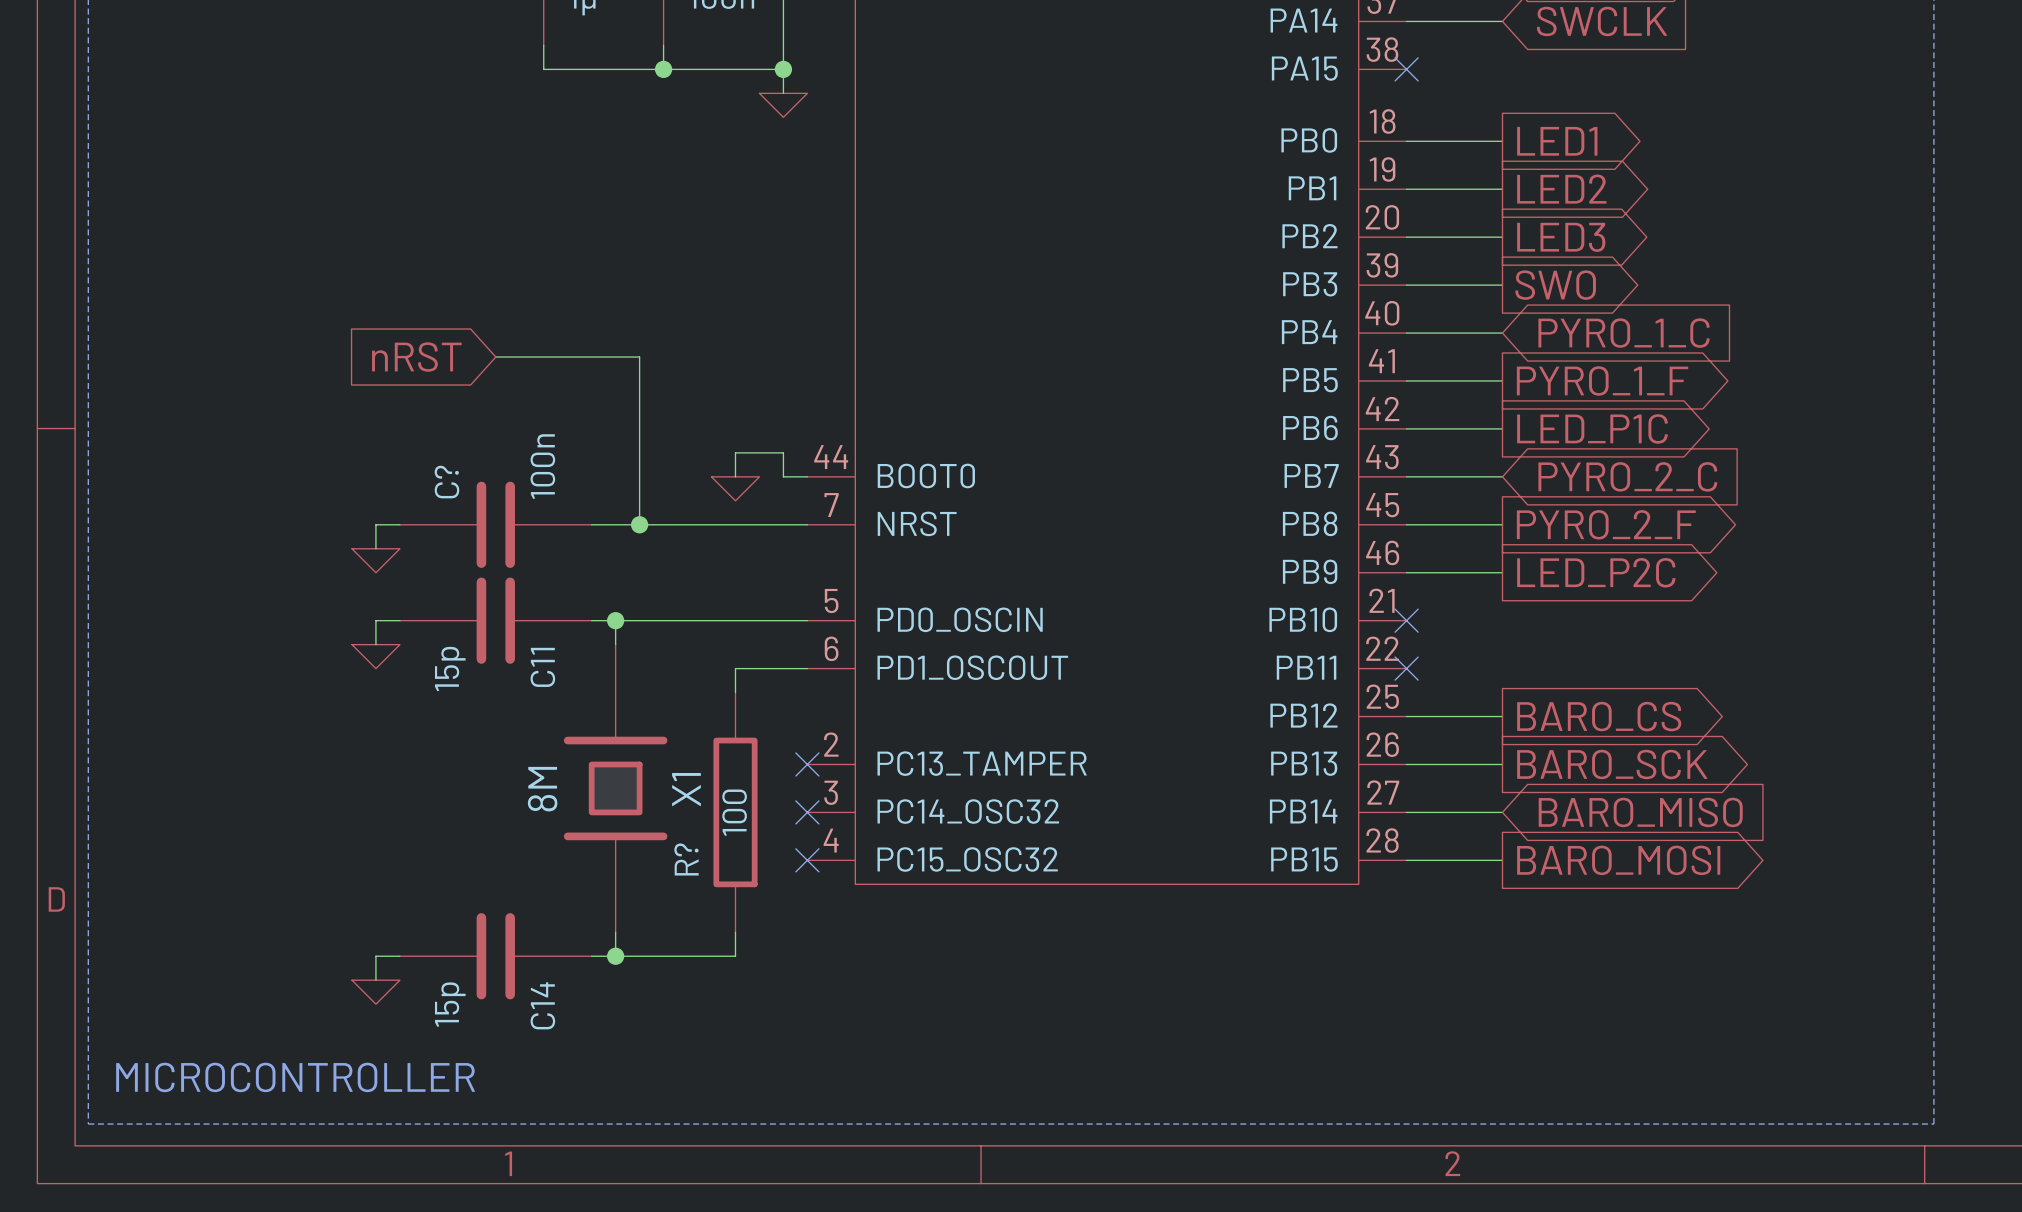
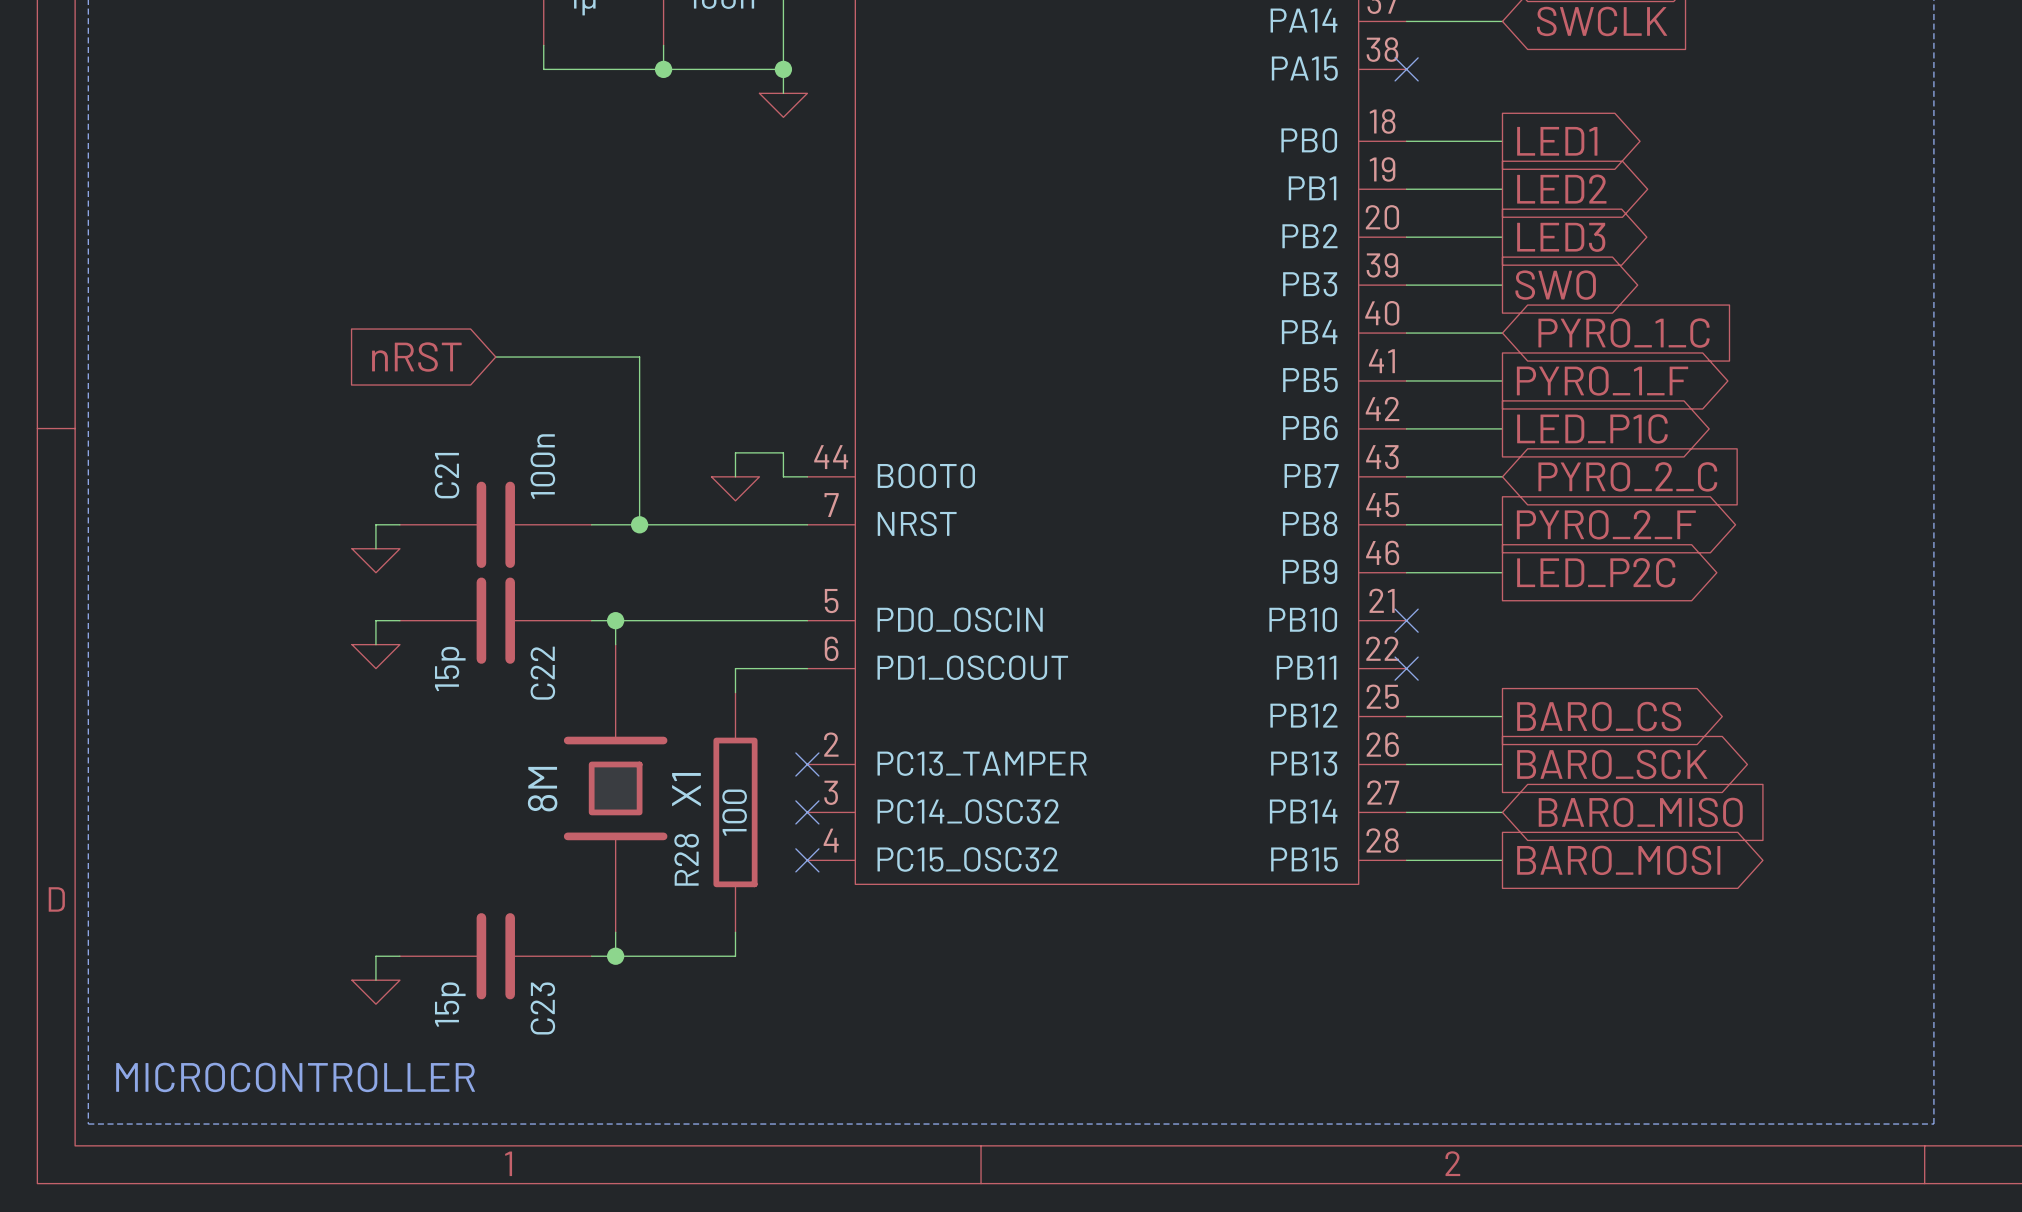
C? name: C? (446, 482) -> C21 (446, 475)
C11 name: C11 (542, 667) -> C22 (542, 673)
R? name: R? (686, 859) -> R28 (686, 859)
C14 name: C14 (542, 1005) -> C23 (542, 1008)

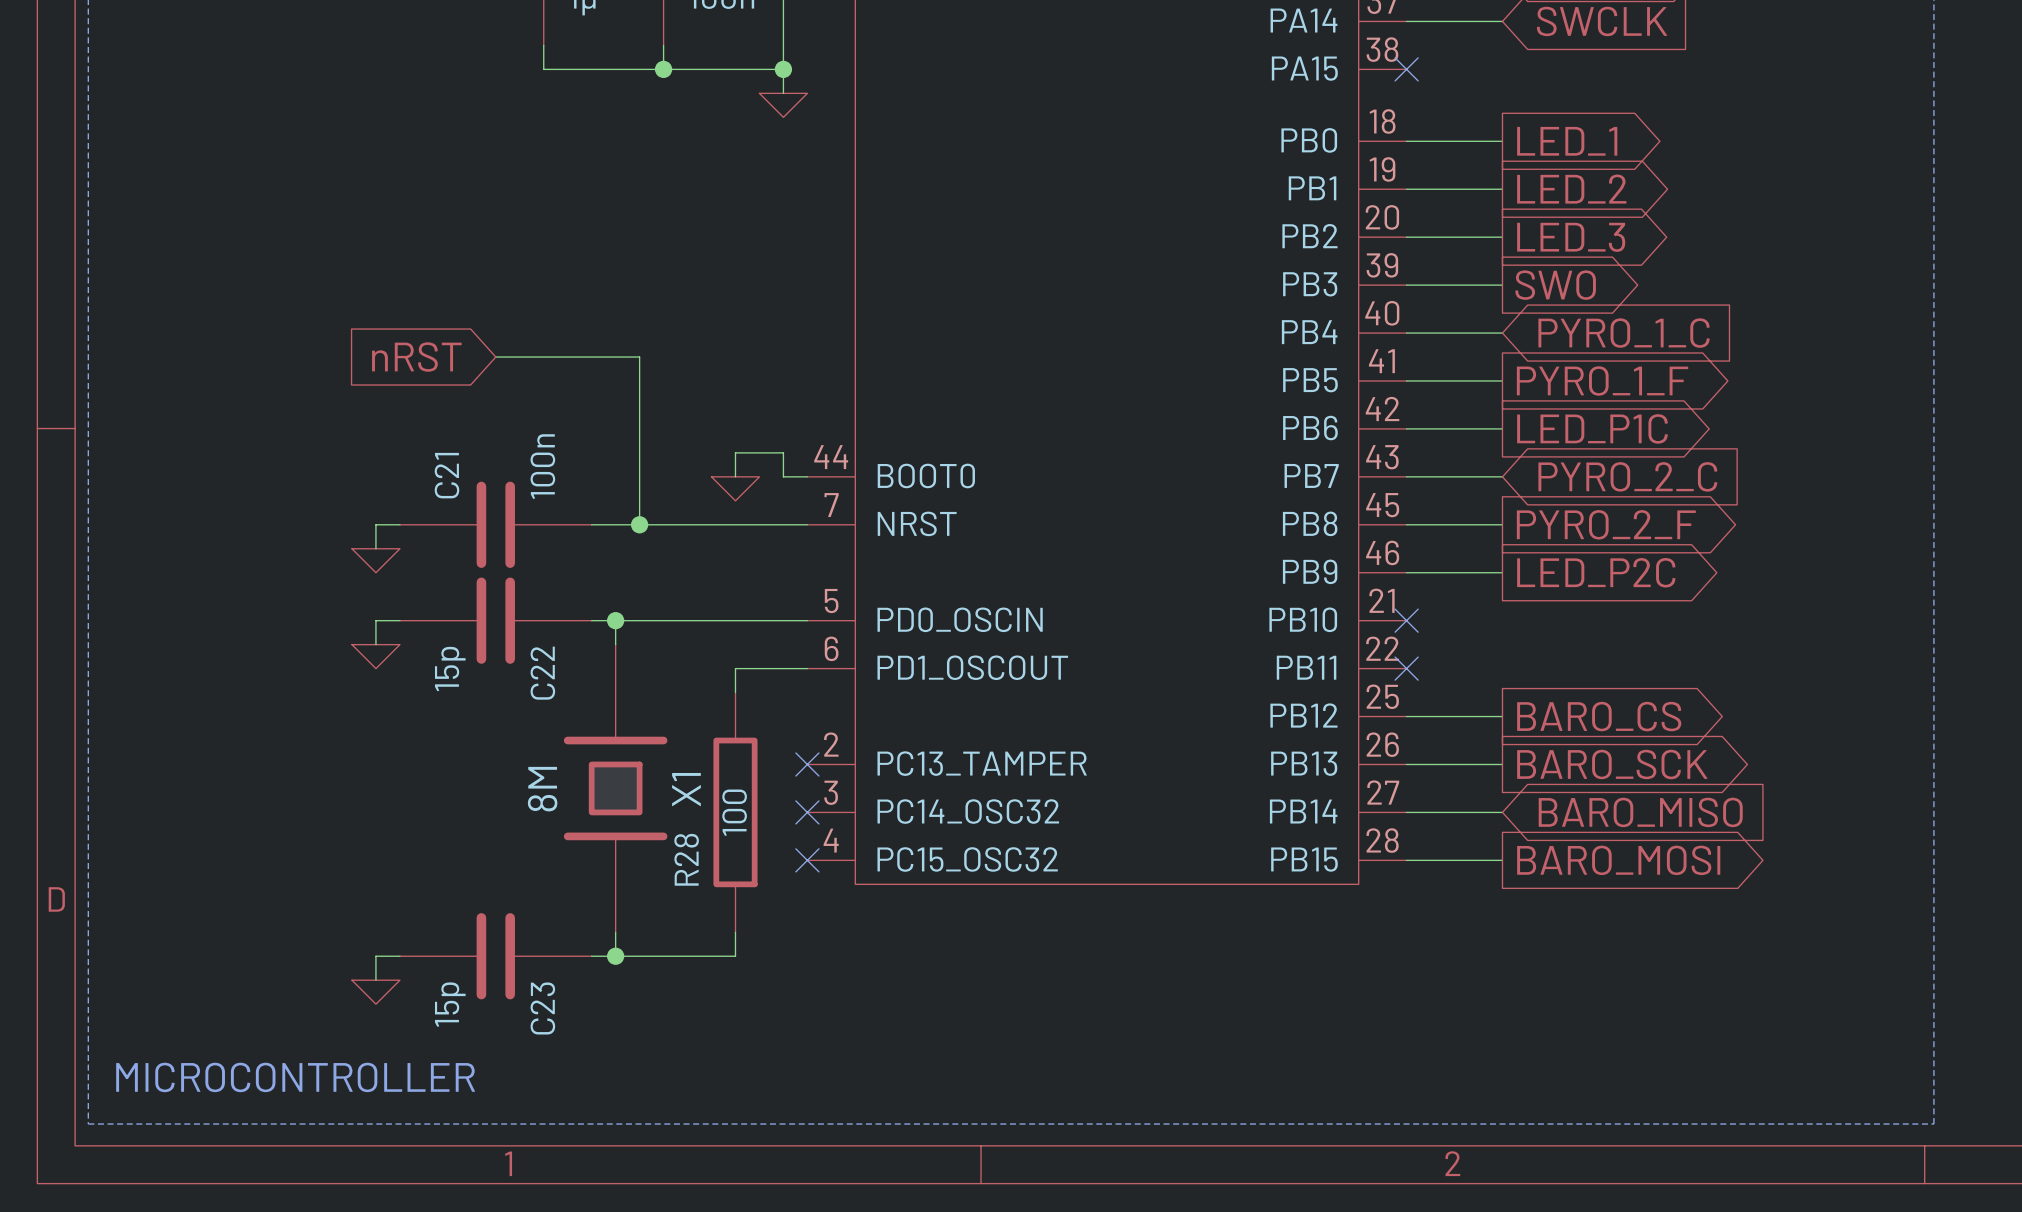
global label: LED1 (1557, 141) -> LED_1 (1567, 141)
global label: LED2 (1561, 189) -> LED_2 (1571, 189)
global label: LED3 (1561, 237) -> LED_3 (1571, 237)

